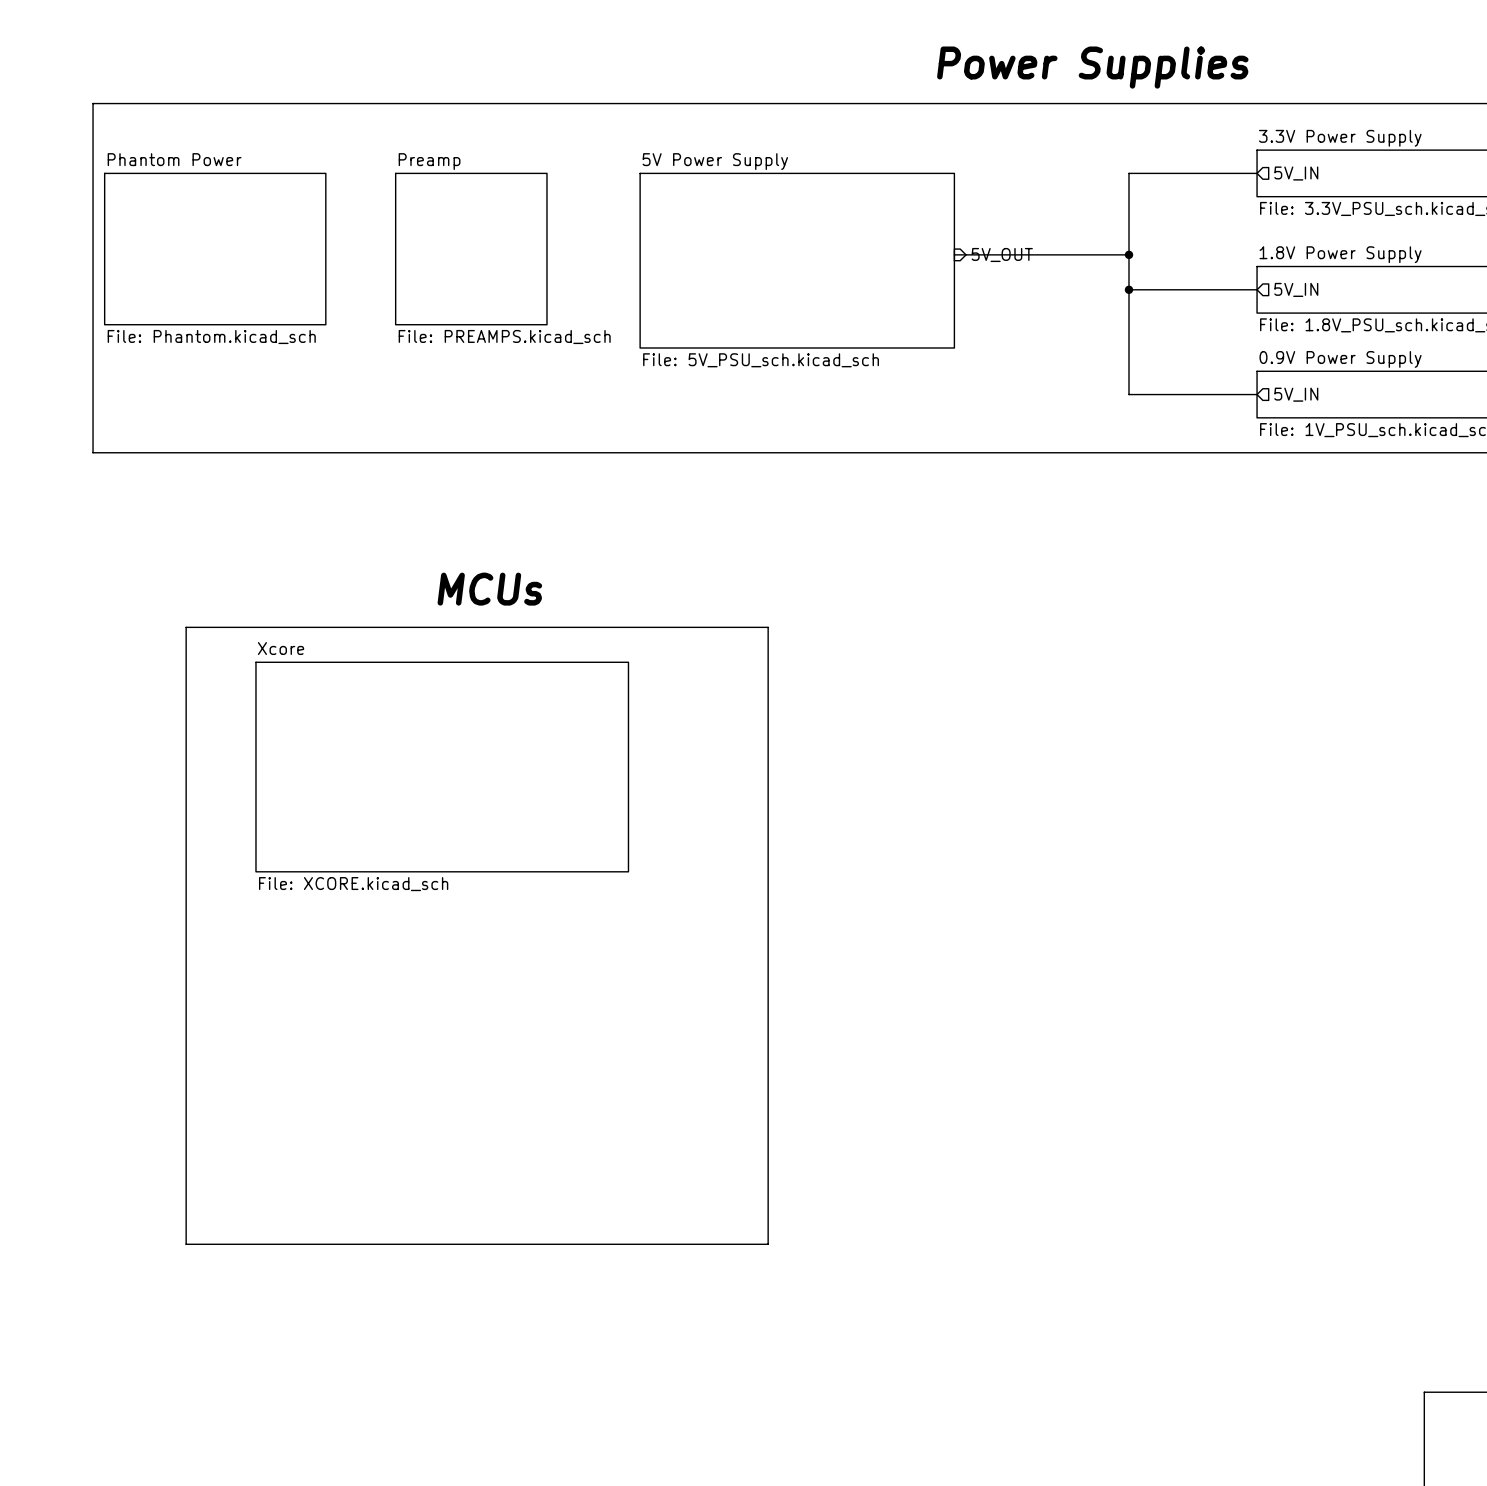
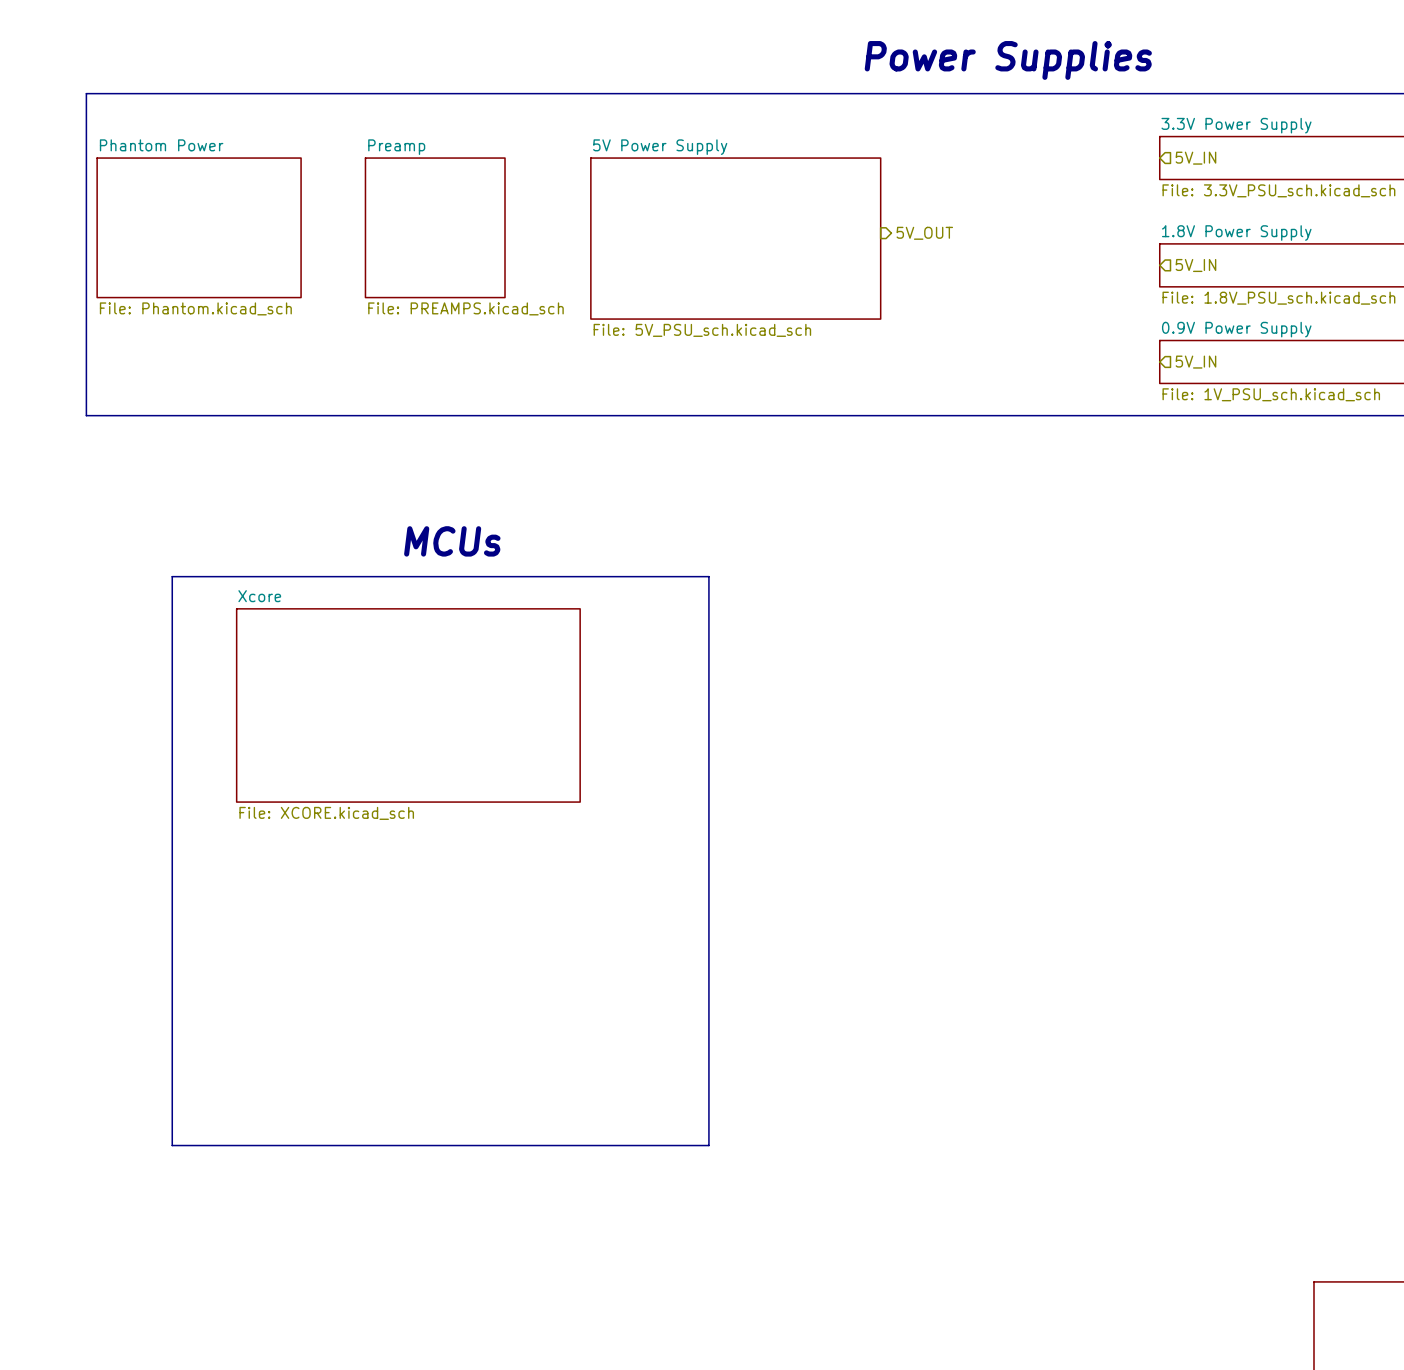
wire: (1257, 173) (1129, 173) (1129, 394) (1257, 394) -> none
wire: (954, 254) (1129, 254) -> none
junction: (1129, 254) -> none
wire: (1129, 289) (1257, 289) -> none
junction: (1129, 289) -> none

